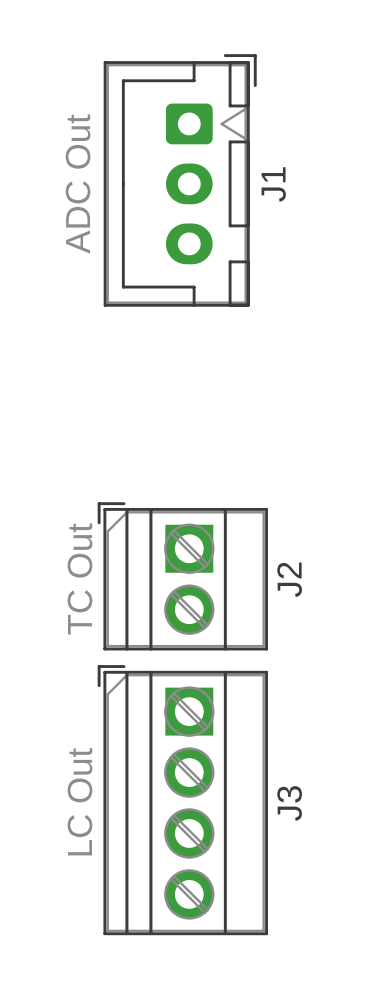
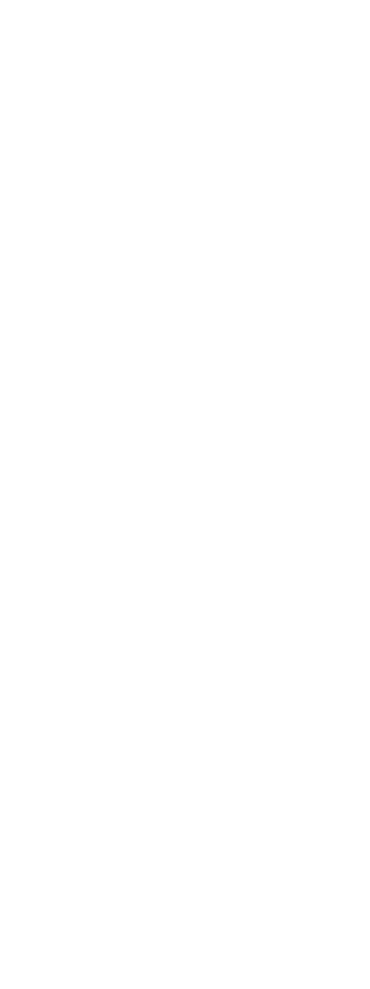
J1: ADC Out (180, 180) -> none
J2: TC Out (182, 576) -> none
J3: LC Out (182, 800) -> none

